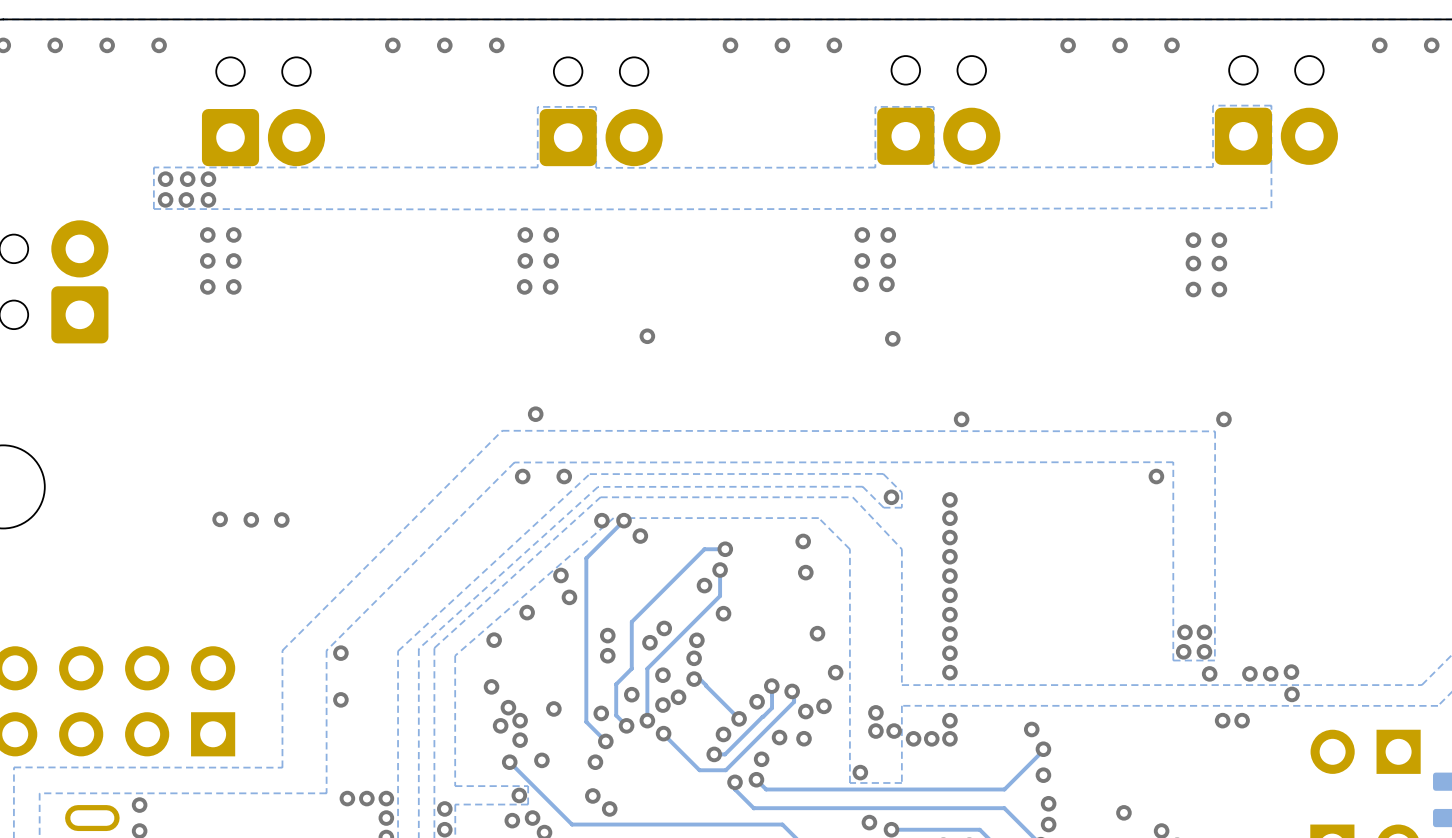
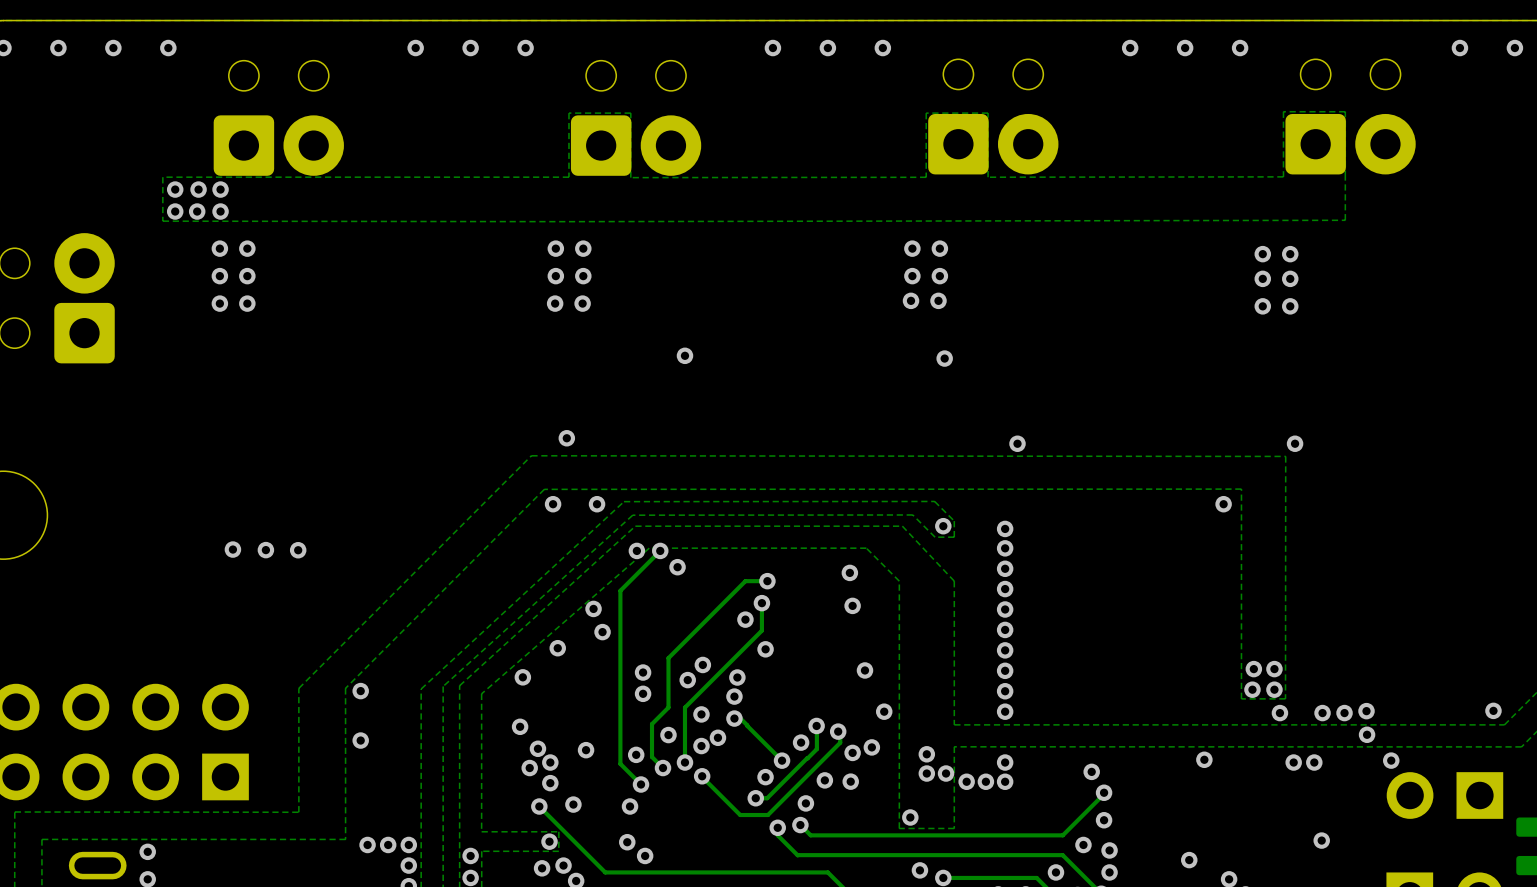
via: none -> (1493, 710)
via: none -> (1204, 759)
via: none -> (1391, 760)
via: none -> (1321, 840)
via: none -> (1083, 844)
via: none -> (1055, 872)

